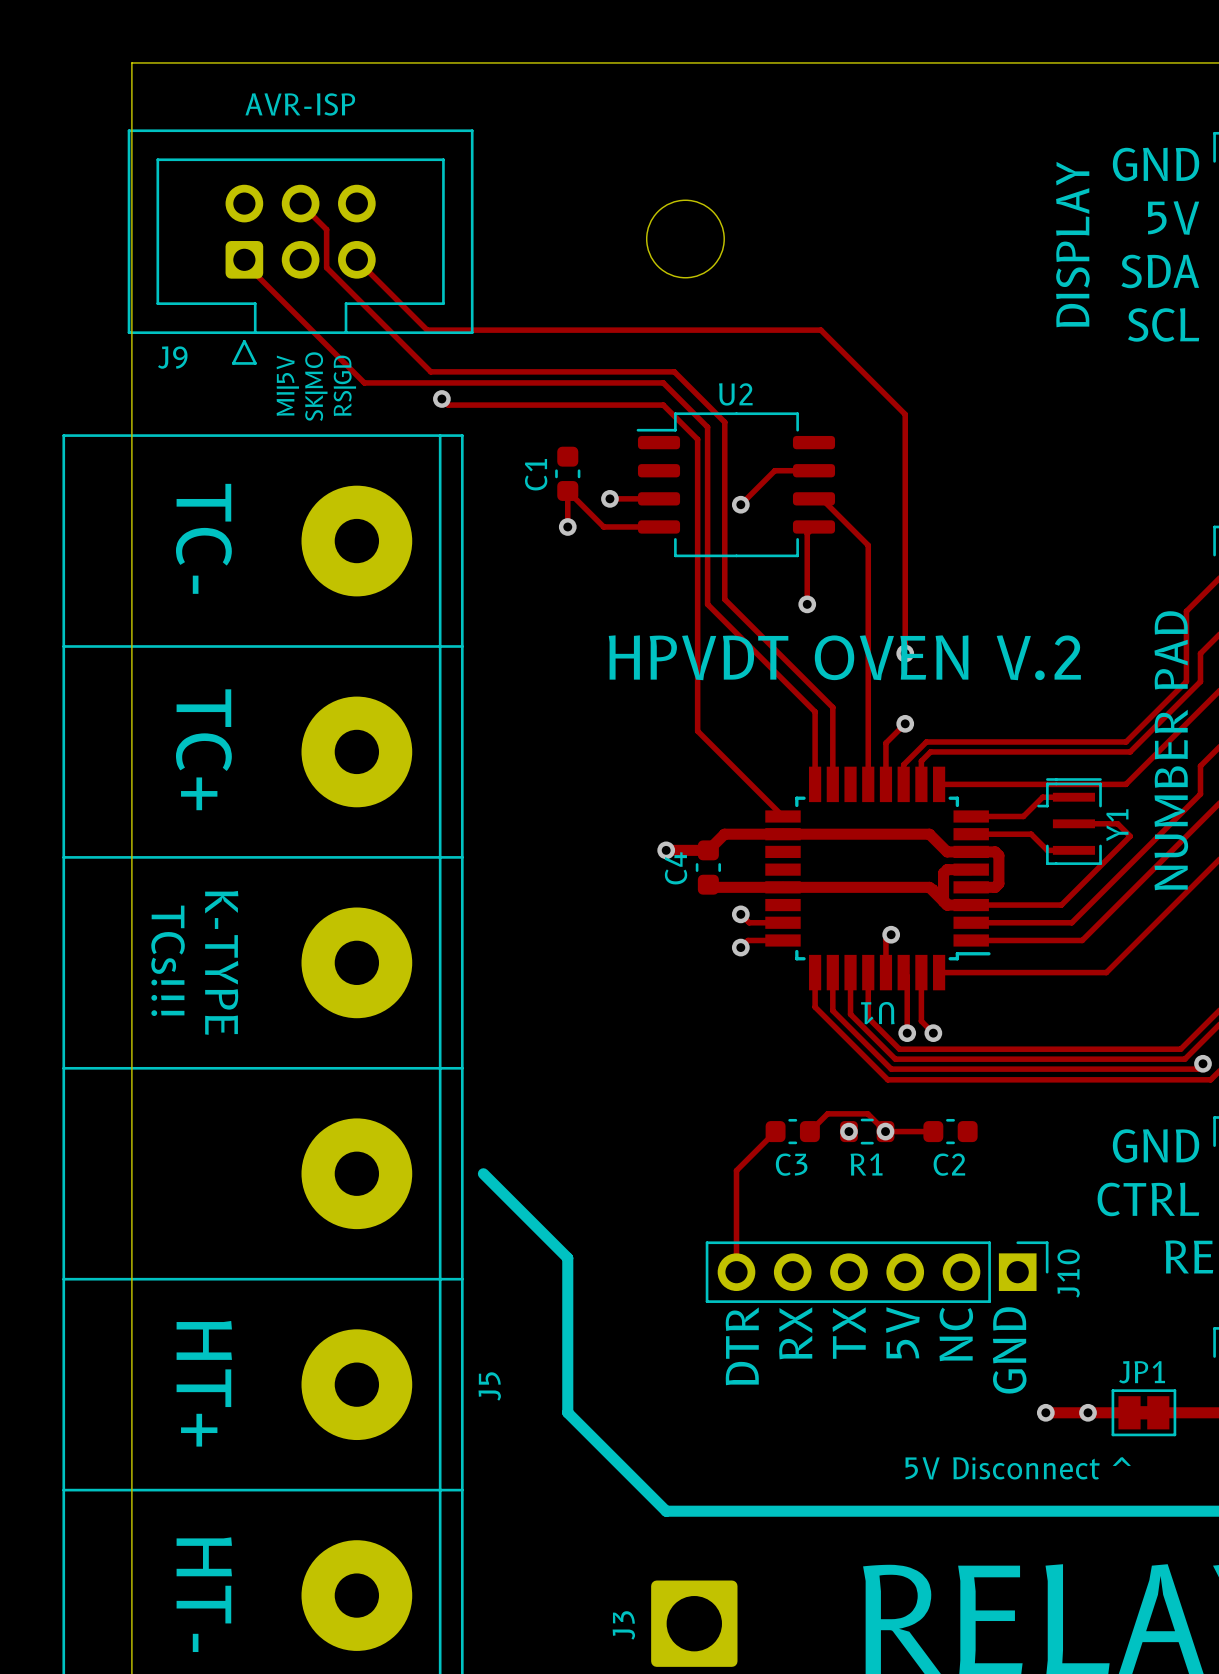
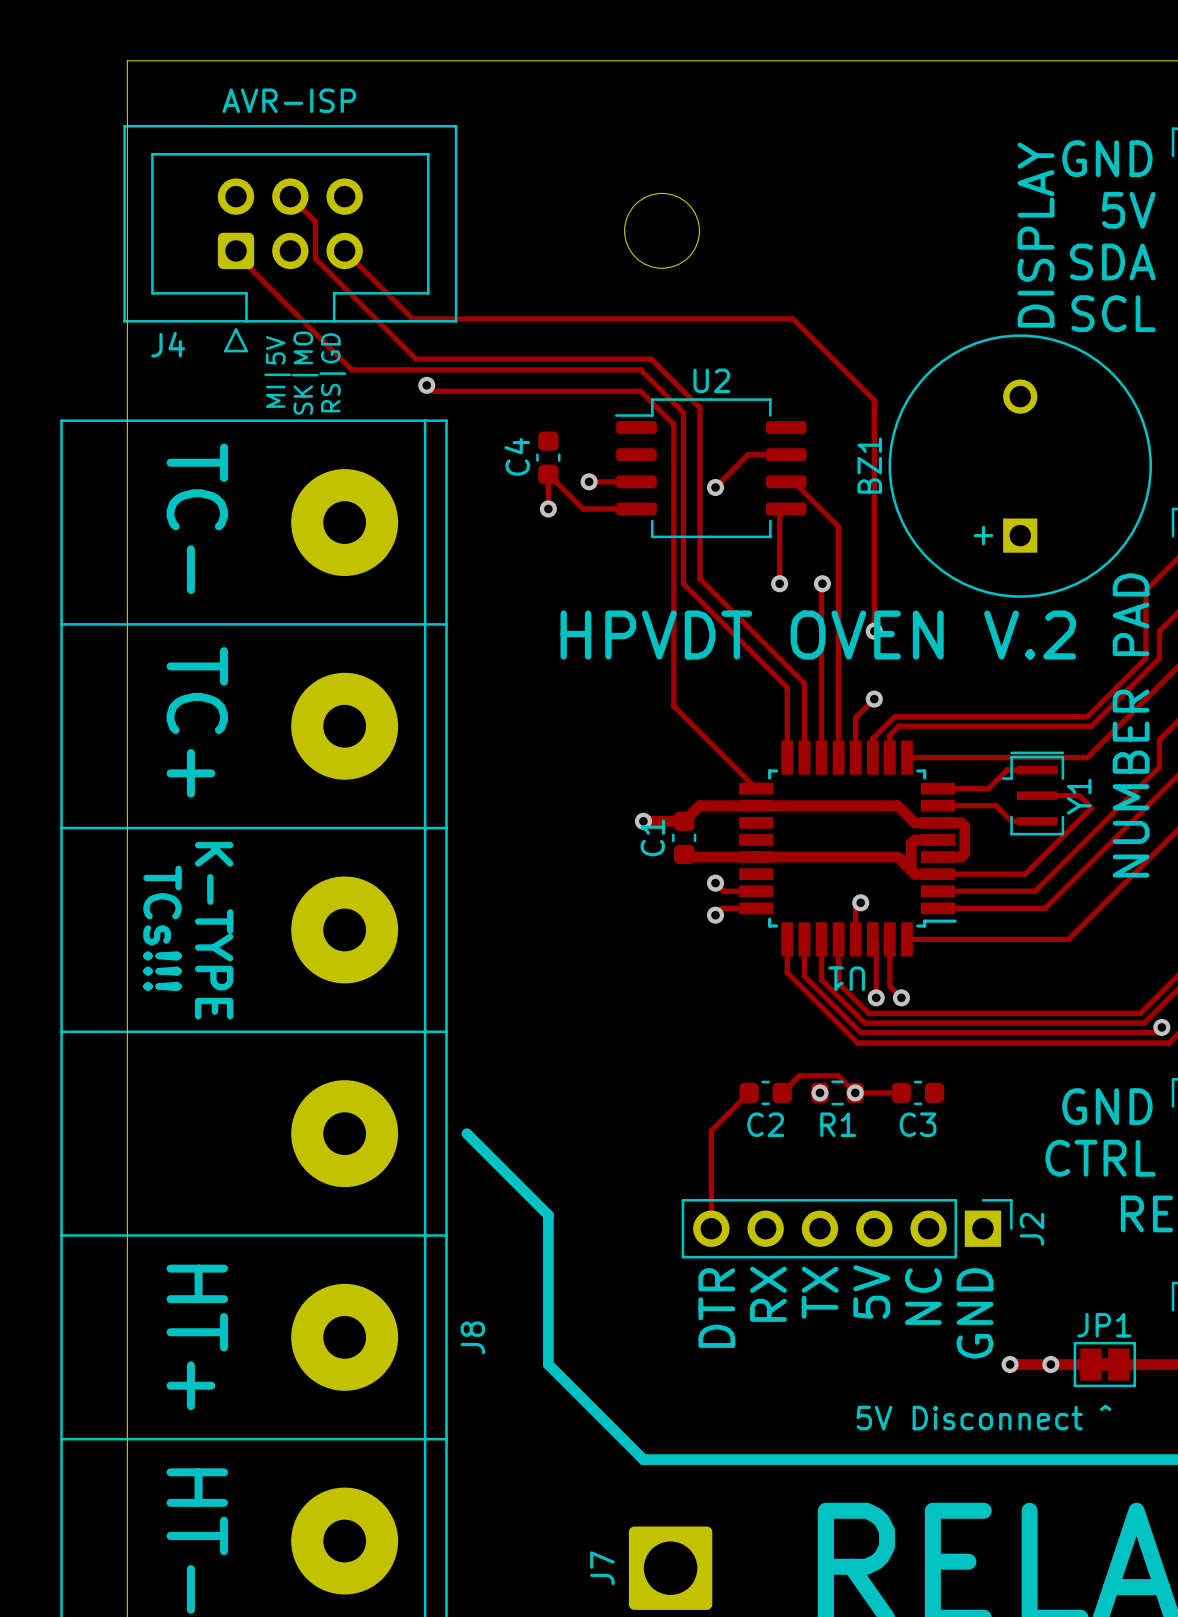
J9 name: J9 (172, 357) -> J4 (168, 344)
C1 name: C1 (536, 474) -> C4 (517, 456)
BZ1: none -> (1020, 466)
track: none -> (822, 583) (821, 757)
via: none -> (822, 583)
C4 name: C4 (676, 868) -> C1 (652, 837)
C3 name: C3 (791, 1164) -> C2 (765, 1124)
C2 name: C2 (949, 1164) -> C3 (918, 1124)
J10 name: J10 (1068, 1273) -> J2 (1031, 1229)
J5 name: J5 (489, 1386) -> J8 (472, 1337)
J3 name: J3 (623, 1625) -> J7 (602, 1568)

